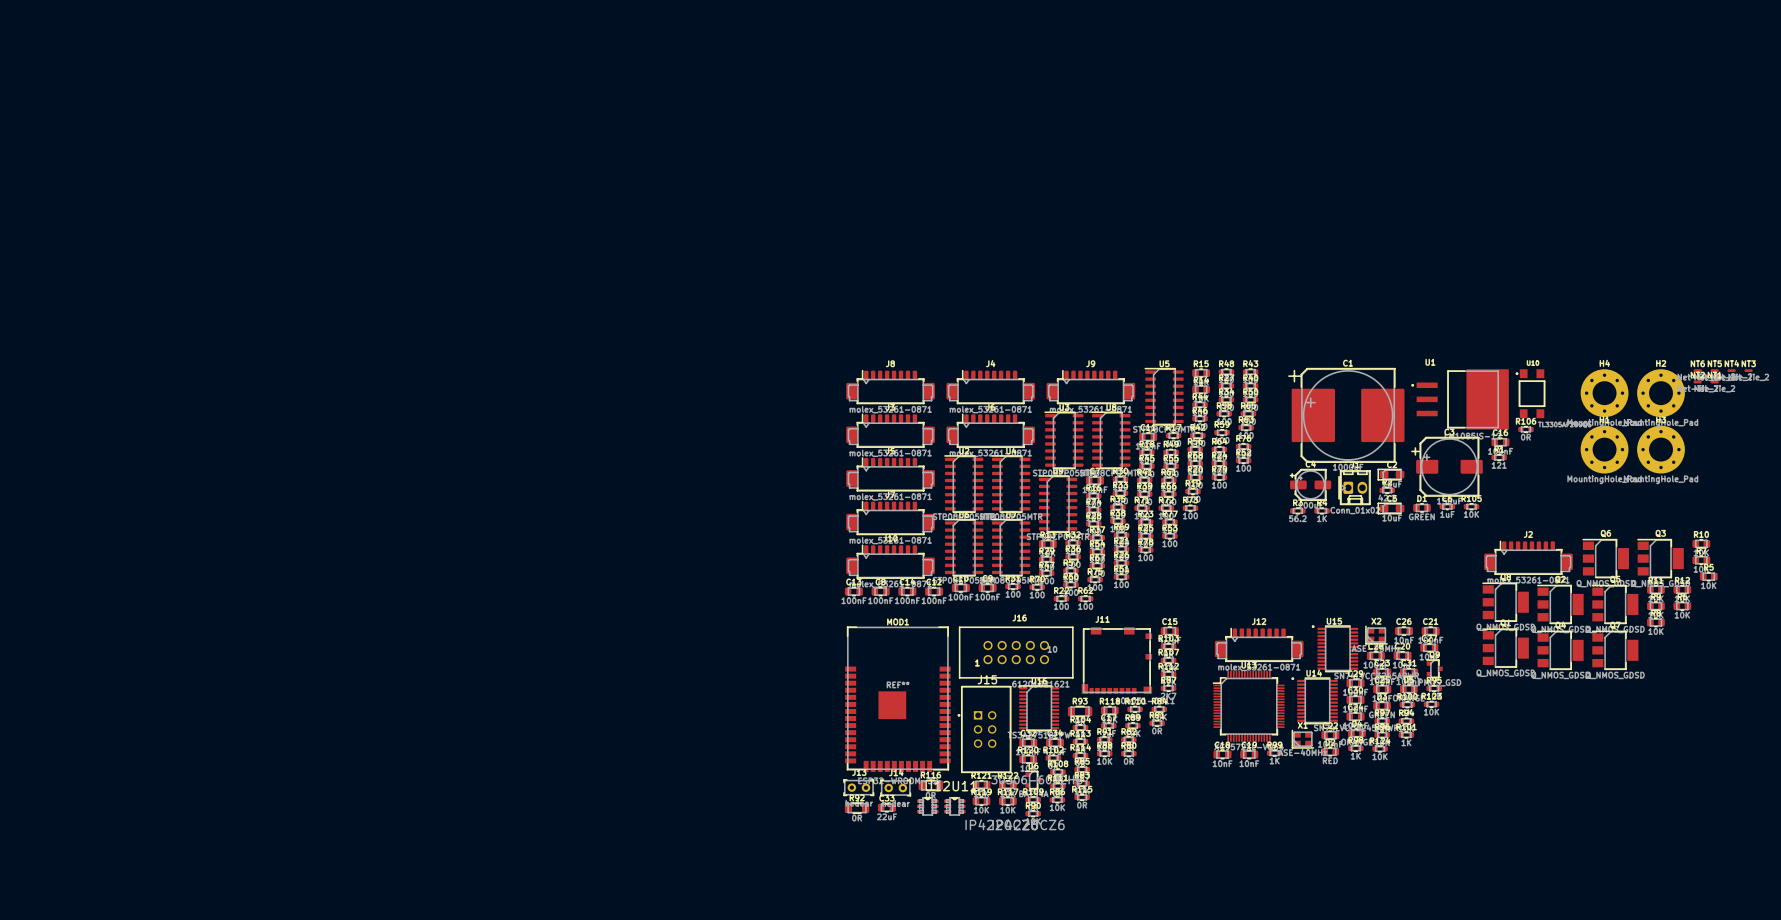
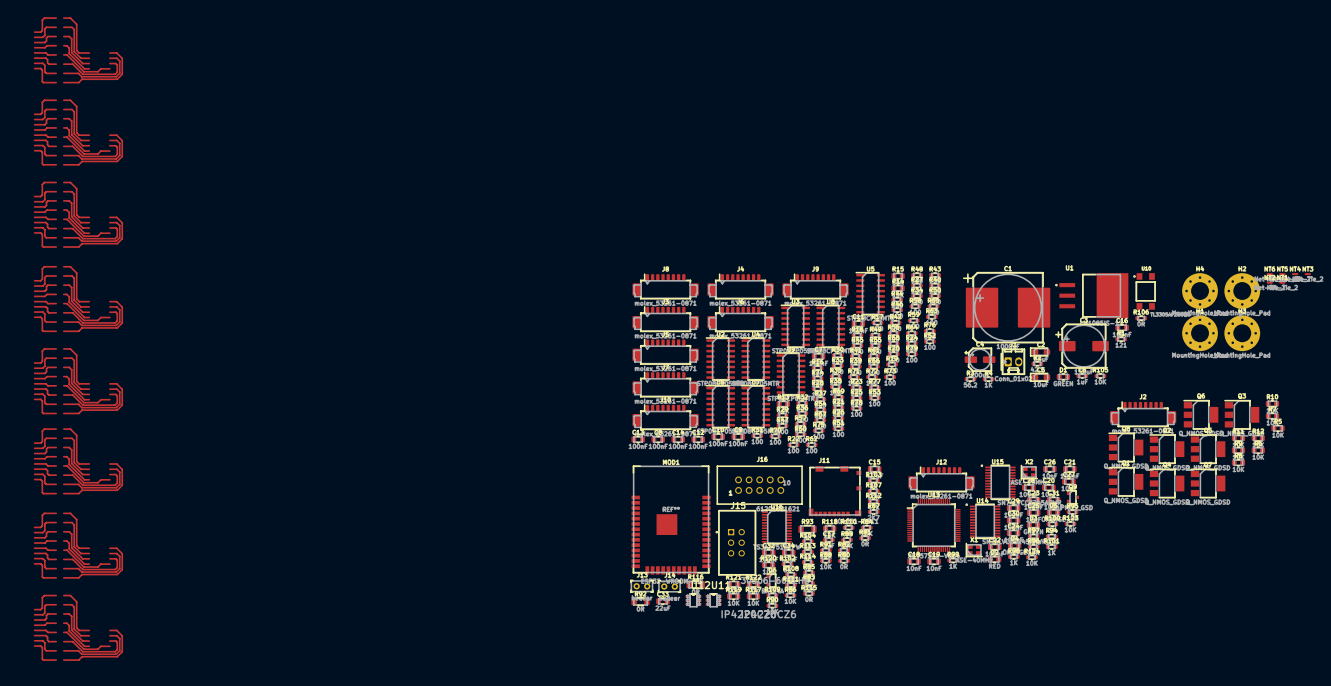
track: none -> (56, 18) (44, 18) (42, 20) (42, 30) (34, 32)
track: none -> (63, 18) (70, 18) (76, 24) (76, 50) (79, 52) (89, 52)
track: none -> (56, 27) (46, 27) (42, 37) (34, 37)
track: none -> (63, 27) (71, 27) (74, 29) (74, 51) (80, 58) (89, 58)
track: none -> (56, 36) (47, 36) (44, 42) (34, 42)
track: none -> (63, 36) (69, 36) (71, 38) (71, 52) (82, 63) (89, 63)
track: none -> (56, 45) (34, 47)
track: none -> (63, 45) (69, 48) (69, 53) (84, 68) (89, 68)
track: none -> (34, 52) (56, 54)
track: none -> (109, 52) (116, 52) (122, 58) (122, 74) (117, 79) (82, 79) (78, 82) (63, 82)
track: none -> (63, 54) (67, 54) (83, 71) (97, 71) (100, 68) (109, 68)
track: none -> (34, 58) (45, 58) (48, 64) (56, 64)
track: none -> (109, 58) (116, 58) (119, 61) (119, 73) (116, 76) (81, 76) (78, 73) (63, 73)
track: none -> (34, 63) (42, 63) (46, 73) (56, 73)
track: none -> (109, 63) (117, 64) (117, 72) (115, 74) (82, 74) (72, 64) (63, 64)
track: none -> (34, 68) (42, 70) (43, 82) (56, 82)
track: none -> (56, 100) (44, 100) (42, 102) (42, 112) (34, 114)
track: none -> (63, 100) (70, 100) (76, 106) (76, 132) (79, 135) (89, 135)
track: none -> (56, 109) (46, 109) (42, 119) (34, 119)
track: none -> (63, 109) (71, 109) (74, 111) (74, 133) (80, 140) (89, 140)
track: none -> (56, 118) (47, 118) (44, 124) (34, 124)
track: none -> (63, 118) (69, 118) (71, 121) (71, 134) (82, 145) (89, 145)
track: none -> (56, 127) (34, 129)
track: none -> (63, 127) (69, 130) (69, 135) (84, 151) (89, 151)
track: none -> (34, 135) (56, 137)
track: none -> (109, 135) (116, 135) (122, 140) (122, 156) (117, 161) (82, 161) (78, 164) (63, 164)
track: none -> (63, 137) (67, 137) (83, 153) (97, 153) (100, 151) (109, 151)
track: none -> (34, 140) (45, 140) (48, 146) (56, 146)
track: none -> (109, 140) (116, 140) (119, 143) (119, 155) (116, 158) (81, 158) (78, 155) (63, 155)
track: none -> (34, 145) (42, 145) (46, 155) (56, 155)
track: none -> (109, 145) (117, 147) (117, 154) (115, 156) (82, 156) (72, 146) (63, 146)
track: none -> (34, 150) (42, 152) (43, 164) (56, 164)
track: none -> (56, 182) (44, 182) (42, 184) (42, 194) (34, 196)
track: none -> (63, 182) (70, 182) (76, 188) (76, 214) (79, 217) (89, 217)
track: none -> (56, 191) (46, 191) (42, 201) (34, 201)
track: none -> (63, 191) (71, 191) (74, 193) (74, 215) (80, 222) (89, 222)
track: none -> (56, 200) (47, 200) (44, 206) (34, 206)
track: none -> (63, 200) (69, 200) (71, 203) (71, 216) (82, 227) (89, 227)
track: none -> (56, 210) (34, 212)
track: none -> (63, 210) (69, 212) (69, 217) (84, 233) (89, 233)
track: none -> (34, 217) (56, 219)
track: none -> (109, 217) (116, 217) (122, 222) (122, 238) (117, 243) (82, 243) (78, 247) (63, 247)
track: none -> (63, 219) (67, 219) (83, 236) (97, 236) (100, 233) (109, 233)
track: none -> (34, 222) (45, 222) (48, 228) (56, 228)
track: none -> (109, 222) (116, 222) (119, 225) (119, 237) (116, 241) (81, 241) (78, 237) (63, 237)
track: none -> (34, 227) (42, 227) (46, 237) (56, 237)
track: none -> (109, 227) (117, 229) (117, 236) (115, 238) (82, 238) (72, 228) (63, 228)
track: none -> (34, 232) (42, 234) (43, 247) (56, 247)
track: none -> (56, 266) (44, 266) (42, 268) (42, 279) (34, 280)
track: none -> (63, 266) (70, 266) (76, 273) (76, 299) (79, 301) (89, 301)
track: none -> (56, 275) (46, 275) (42, 286) (34, 286)
track: none -> (63, 275) (71, 275) (74, 278) (74, 300) (80, 306) (89, 306)
track: none -> (56, 285) (47, 285) (44, 291) (34, 291)
track: none -> (63, 285) (69, 285) (71, 287) (71, 301) (82, 312) (89, 312)
track: none -> (56, 294) (34, 296)
track: none -> (63, 294) (69, 296) (69, 302) (84, 317) (89, 317)
track: none -> (34, 301) (56, 303)
track: none -> (109, 301) (116, 301) (122, 307) (122, 322) (117, 327) (82, 327) (78, 331) (63, 331)
track: none -> (63, 303) (67, 303) (83, 320) (97, 320) (100, 317) (109, 317)
track: none -> (34, 306) (45, 306) (48, 312) (56, 312)
track: none -> (109, 306) (116, 306) (119, 309) (119, 321) (116, 325) (81, 325) (78, 322) (63, 322)
track: none -> (34, 312) (42, 312) (46, 322) (56, 322)
track: none -> (109, 312) (117, 313) (117, 320) (115, 322) (82, 322) (72, 312) (63, 312)
track: none -> (34, 317) (42, 318) (43, 331) (56, 331)
track: none -> (56, 348) (44, 348) (42, 351) (42, 361) (34, 363)
track: none -> (63, 348) (70, 348) (76, 355) (76, 381) (79, 383) (89, 383)
track: none -> (56, 358) (46, 358) (42, 368) (34, 368)
track: none -> (63, 358) (71, 358) (74, 360) (74, 382) (80, 389) (89, 389)
track: none -> (56, 367) (47, 367) (44, 373) (34, 373)
track: none -> (63, 367) (69, 367) (71, 369) (71, 383) (82, 394) (89, 394)
track: none -> (56, 376) (34, 378)
track: none -> (63, 376) (69, 378) (69, 384) (84, 399) (89, 399)
track: none -> (34, 383) (56, 385)
track: none -> (109, 383) (116, 383) (122, 389) (122, 405) (117, 410) (82, 410) (78, 413) (63, 413)
track: none -> (63, 385) (67, 385) (83, 402) (97, 402) (100, 399) (109, 399)
track: none -> (34, 389) (45, 389) (48, 395) (56, 395)
track: none -> (109, 389) (116, 389) (119, 392) (119, 404) (116, 407) (81, 407) (78, 404) (63, 404)
track: none -> (34, 394) (42, 394) (46, 404) (56, 404)
track: none -> (109, 394) (117, 395) (117, 403) (115, 405) (82, 405) (72, 395) (63, 395)
track: none -> (34, 399) (42, 400) (43, 413) (56, 413)
track: none -> (56, 429) (44, 429) (42, 431) (42, 441) (34, 443)
track: none -> (63, 429) (70, 429) (76, 435) (76, 461) (79, 463) (89, 463)
track: none -> (56, 438) (46, 438) (42, 448) (34, 448)
track: none -> (63, 438) (71, 438) (74, 440) (74, 462) (80, 469) (89, 469)
track: none -> (56, 447) (47, 447) (44, 453) (34, 453)
track: none -> (63, 447) (69, 447) (71, 449) (71, 463) (82, 474) (89, 474)
track: none -> (56, 456) (34, 458)
track: none -> (63, 456) (69, 459) (69, 464) (84, 479) (89, 479)
track: none -> (34, 463) (56, 465)
track: none -> (109, 463) (116, 463) (122, 469) (122, 485) (117, 490) (82, 490) (78, 493) (63, 493)
track: none -> (63, 465) (67, 465) (83, 482) (97, 482) (100, 479) (109, 479)
track: none -> (34, 469) (45, 469) (48, 475) (56, 475)
track: none -> (109, 469) (116, 469) (119, 472) (119, 484) (116, 487) (81, 487) (78, 484) (63, 484)
track: none -> (34, 474) (42, 474) (46, 484) (56, 484)
track: none -> (109, 474) (117, 475) (117, 483) (115, 485) (82, 485) (72, 475) (63, 475)
track: none -> (34, 479) (42, 481) (43, 493) (56, 493)
track: none -> (56, 513) (44, 513) (42, 515) (42, 525) (34, 527)
track: none -> (63, 513) (70, 513) (76, 519) (76, 545) (79, 548) (89, 548)
track: none -> (56, 522) (46, 522) (42, 532) (34, 532)
track: none -> (63, 522) (71, 522) (74, 524) (74, 546) (80, 553) (89, 553)
track: none -> (56, 531) (47, 531) (44, 537) (34, 537)
track: none -> (63, 531) (69, 531) (71, 534) (71, 547) (82, 558) (89, 558)
track: none -> (56, 541) (34, 543)
track: none -> (63, 541) (69, 543) (69, 548) (84, 564) (89, 564)
track: none -> (34, 548) (56, 550)
track: none -> (109, 548) (116, 548) (122, 553) (122, 569) (117, 574) (82, 574) (78, 577) (63, 577)
track: none -> (63, 550) (67, 550) (83, 567) (97, 567) (100, 564) (109, 564)
track: none -> (34, 553) (45, 553) (48, 559) (56, 559)
track: none -> (109, 553) (116, 553) (119, 556) (119, 568) (116, 572) (81, 572) (78, 568) (63, 568)
track: none -> (34, 558) (42, 558) (46, 568) (56, 568)
track: none -> (109, 558) (117, 560) (117, 567) (115, 569) (82, 569) (72, 559) (63, 559)
track: none -> (34, 563) (42, 565) (43, 577) (56, 577)
track: none -> (56, 595) (44, 595) (42, 597) (42, 608) (34, 609)
track: none -> (63, 595) (70, 595) (76, 601) (76, 627) (79, 630) (89, 630)
track: none -> (56, 604) (46, 604) (42, 614) (34, 614)
track: none -> (63, 604) (71, 604) (74, 607) (74, 628) (80, 635) (89, 635)
track: none -> (56, 614) (47, 614) (44, 620) (34, 620)
track: none -> (63, 614) (69, 614) (71, 616) (71, 629) (82, 641) (89, 641)
track: none -> (56, 623) (34, 625)
track: none -> (63, 623) (69, 625) (69, 631) (84, 646) (89, 646)
track: none -> (34, 630) (56, 632)
track: none -> (109, 630) (116, 630) (122, 635) (122, 651) (117, 656) (82, 656) (78, 660) (63, 660)
track: none -> (63, 632) (67, 632) (83, 649) (97, 649) (100, 646) (109, 646)
track: none -> (34, 635) (45, 635) (48, 641) (56, 641)
track: none -> (109, 635) (116, 635) (119, 638) (119, 650) (116, 654) (81, 654) (78, 650) (63, 650)
track: none -> (34, 640) (42, 640) (46, 650) (56, 650)
track: none -> (109, 641) (117, 642) (117, 649) (115, 651) (82, 651) (72, 641) (63, 641)
track: none -> (34, 646) (42, 647) (43, 660) (56, 660)

